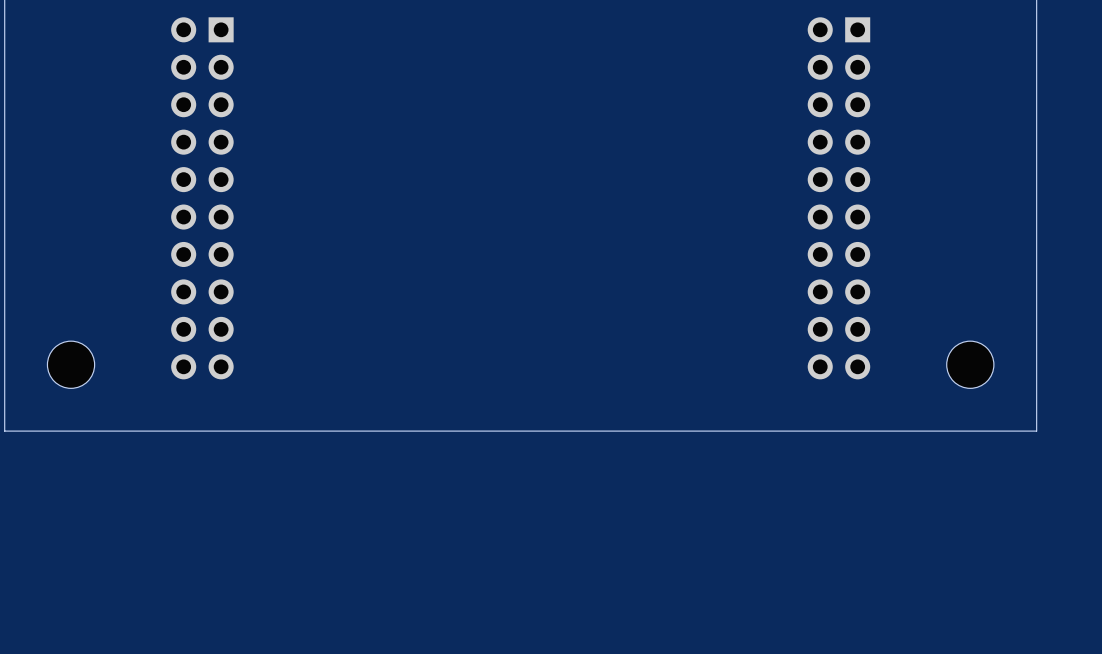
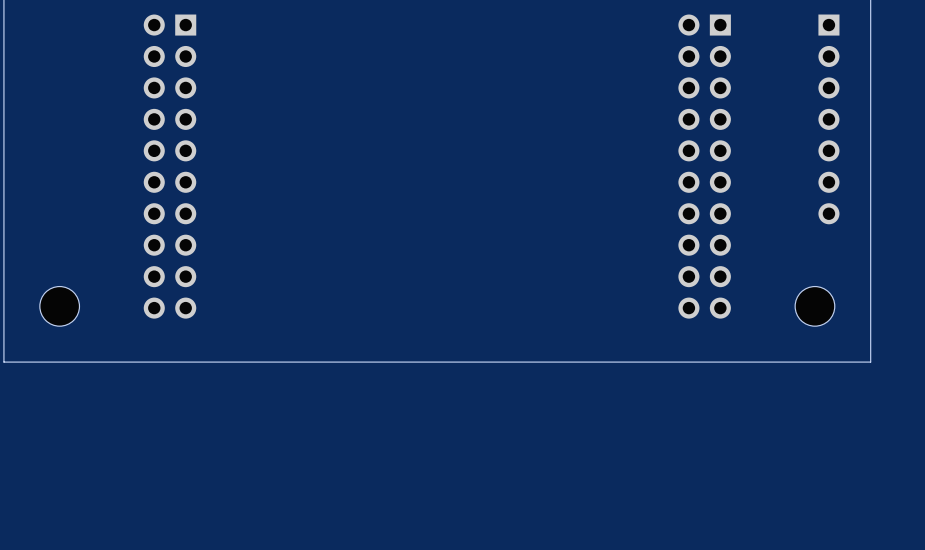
part: none -> (828, 119)

